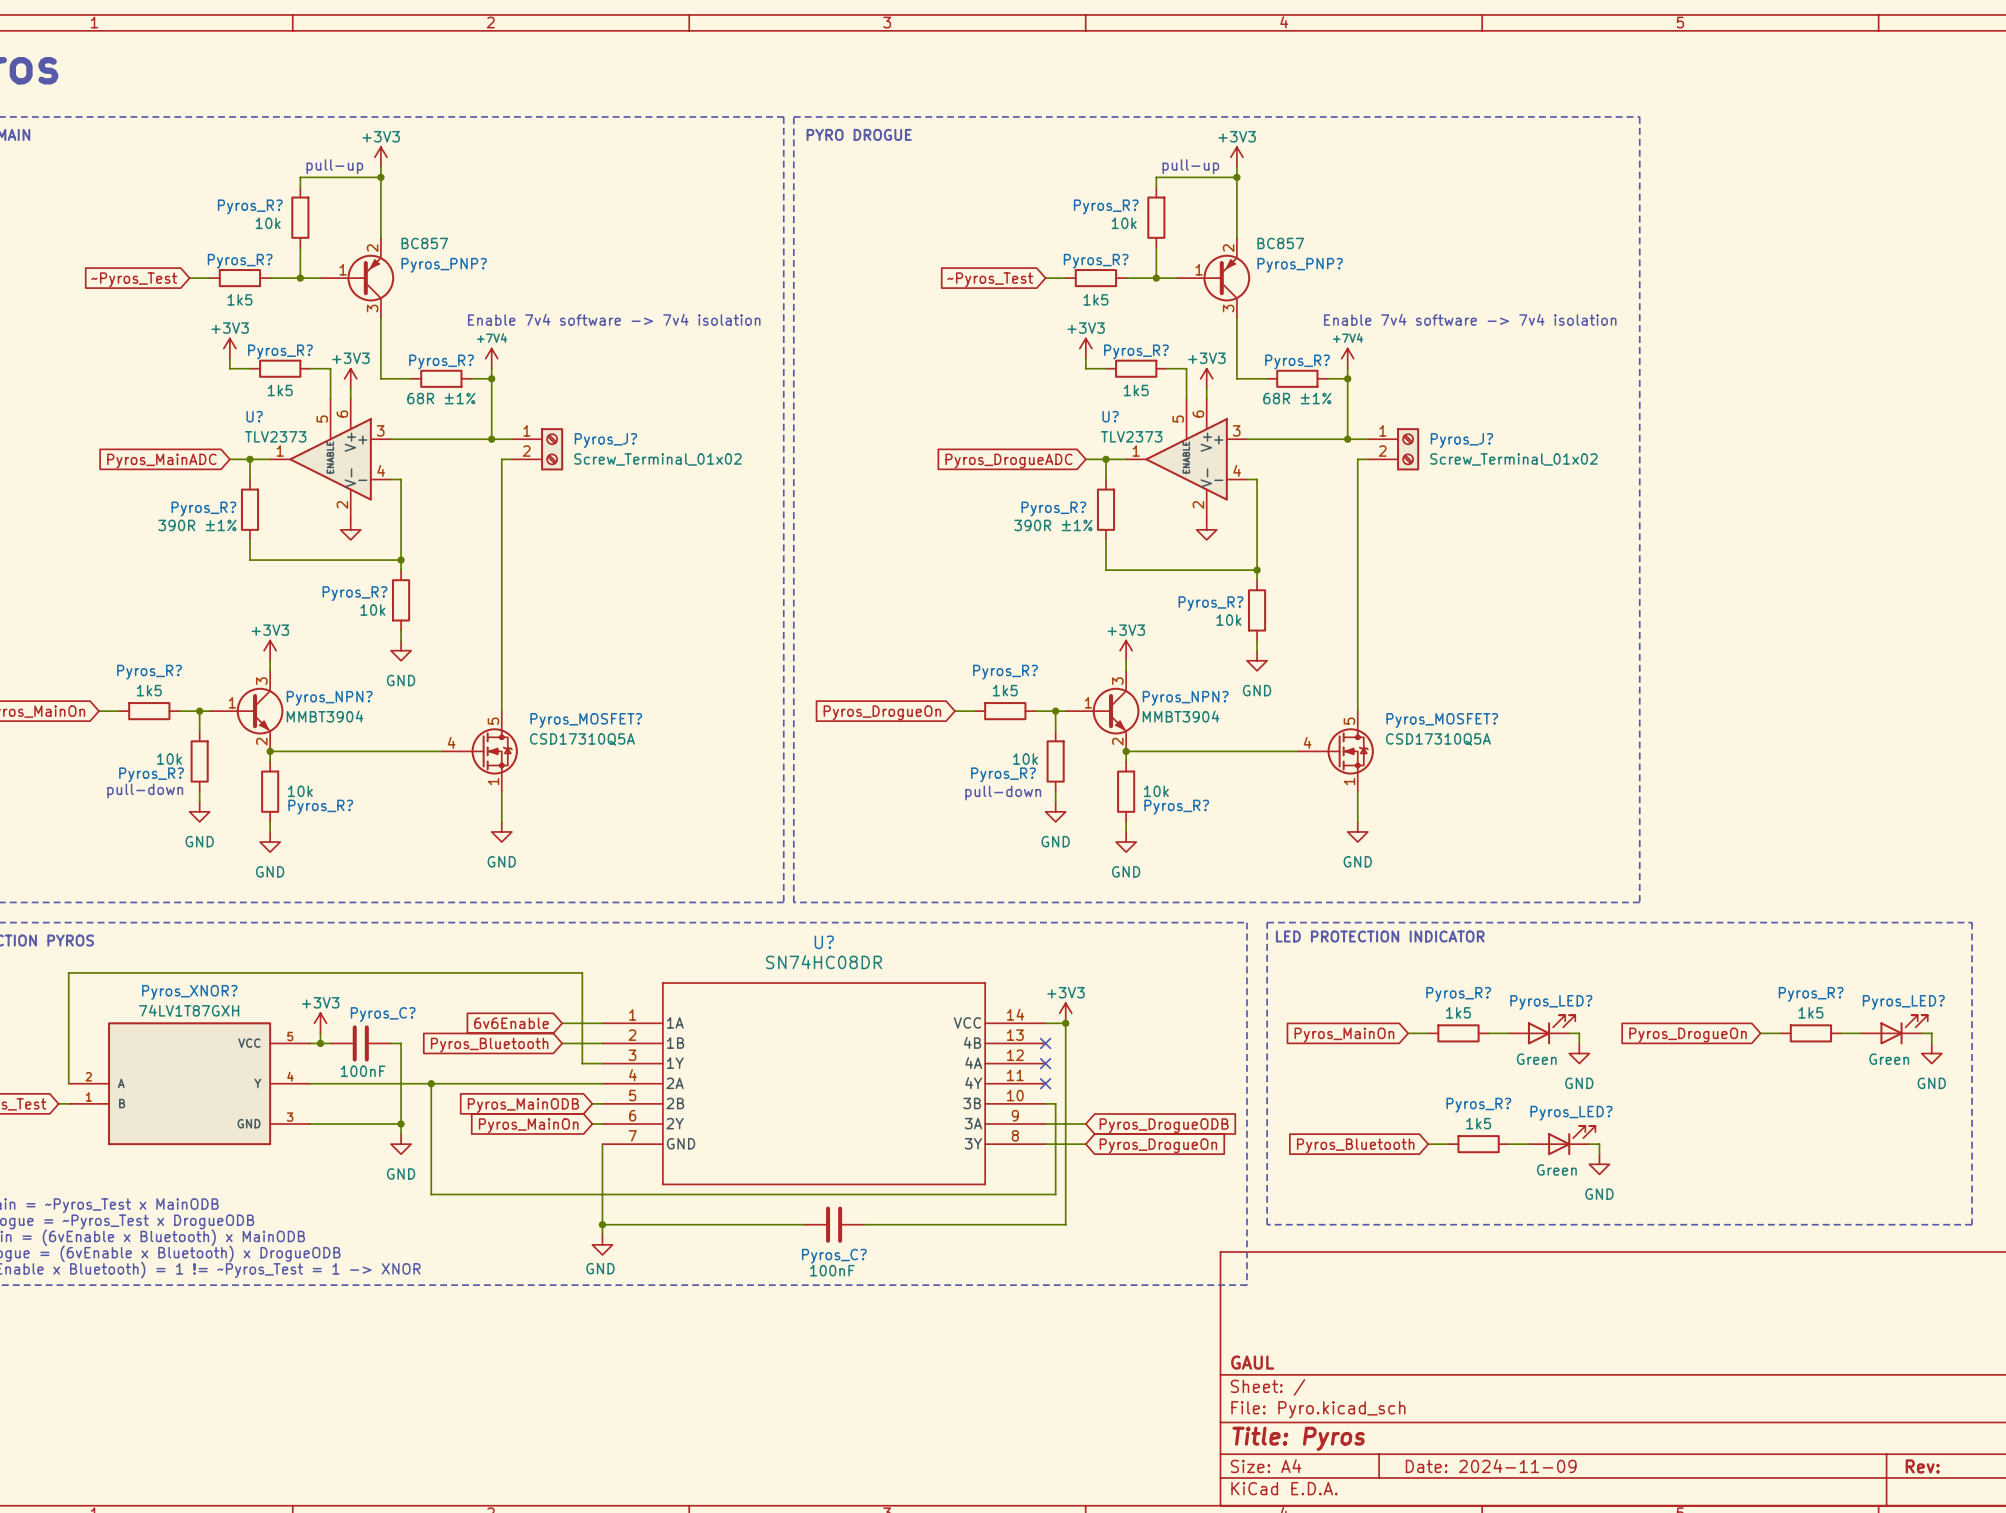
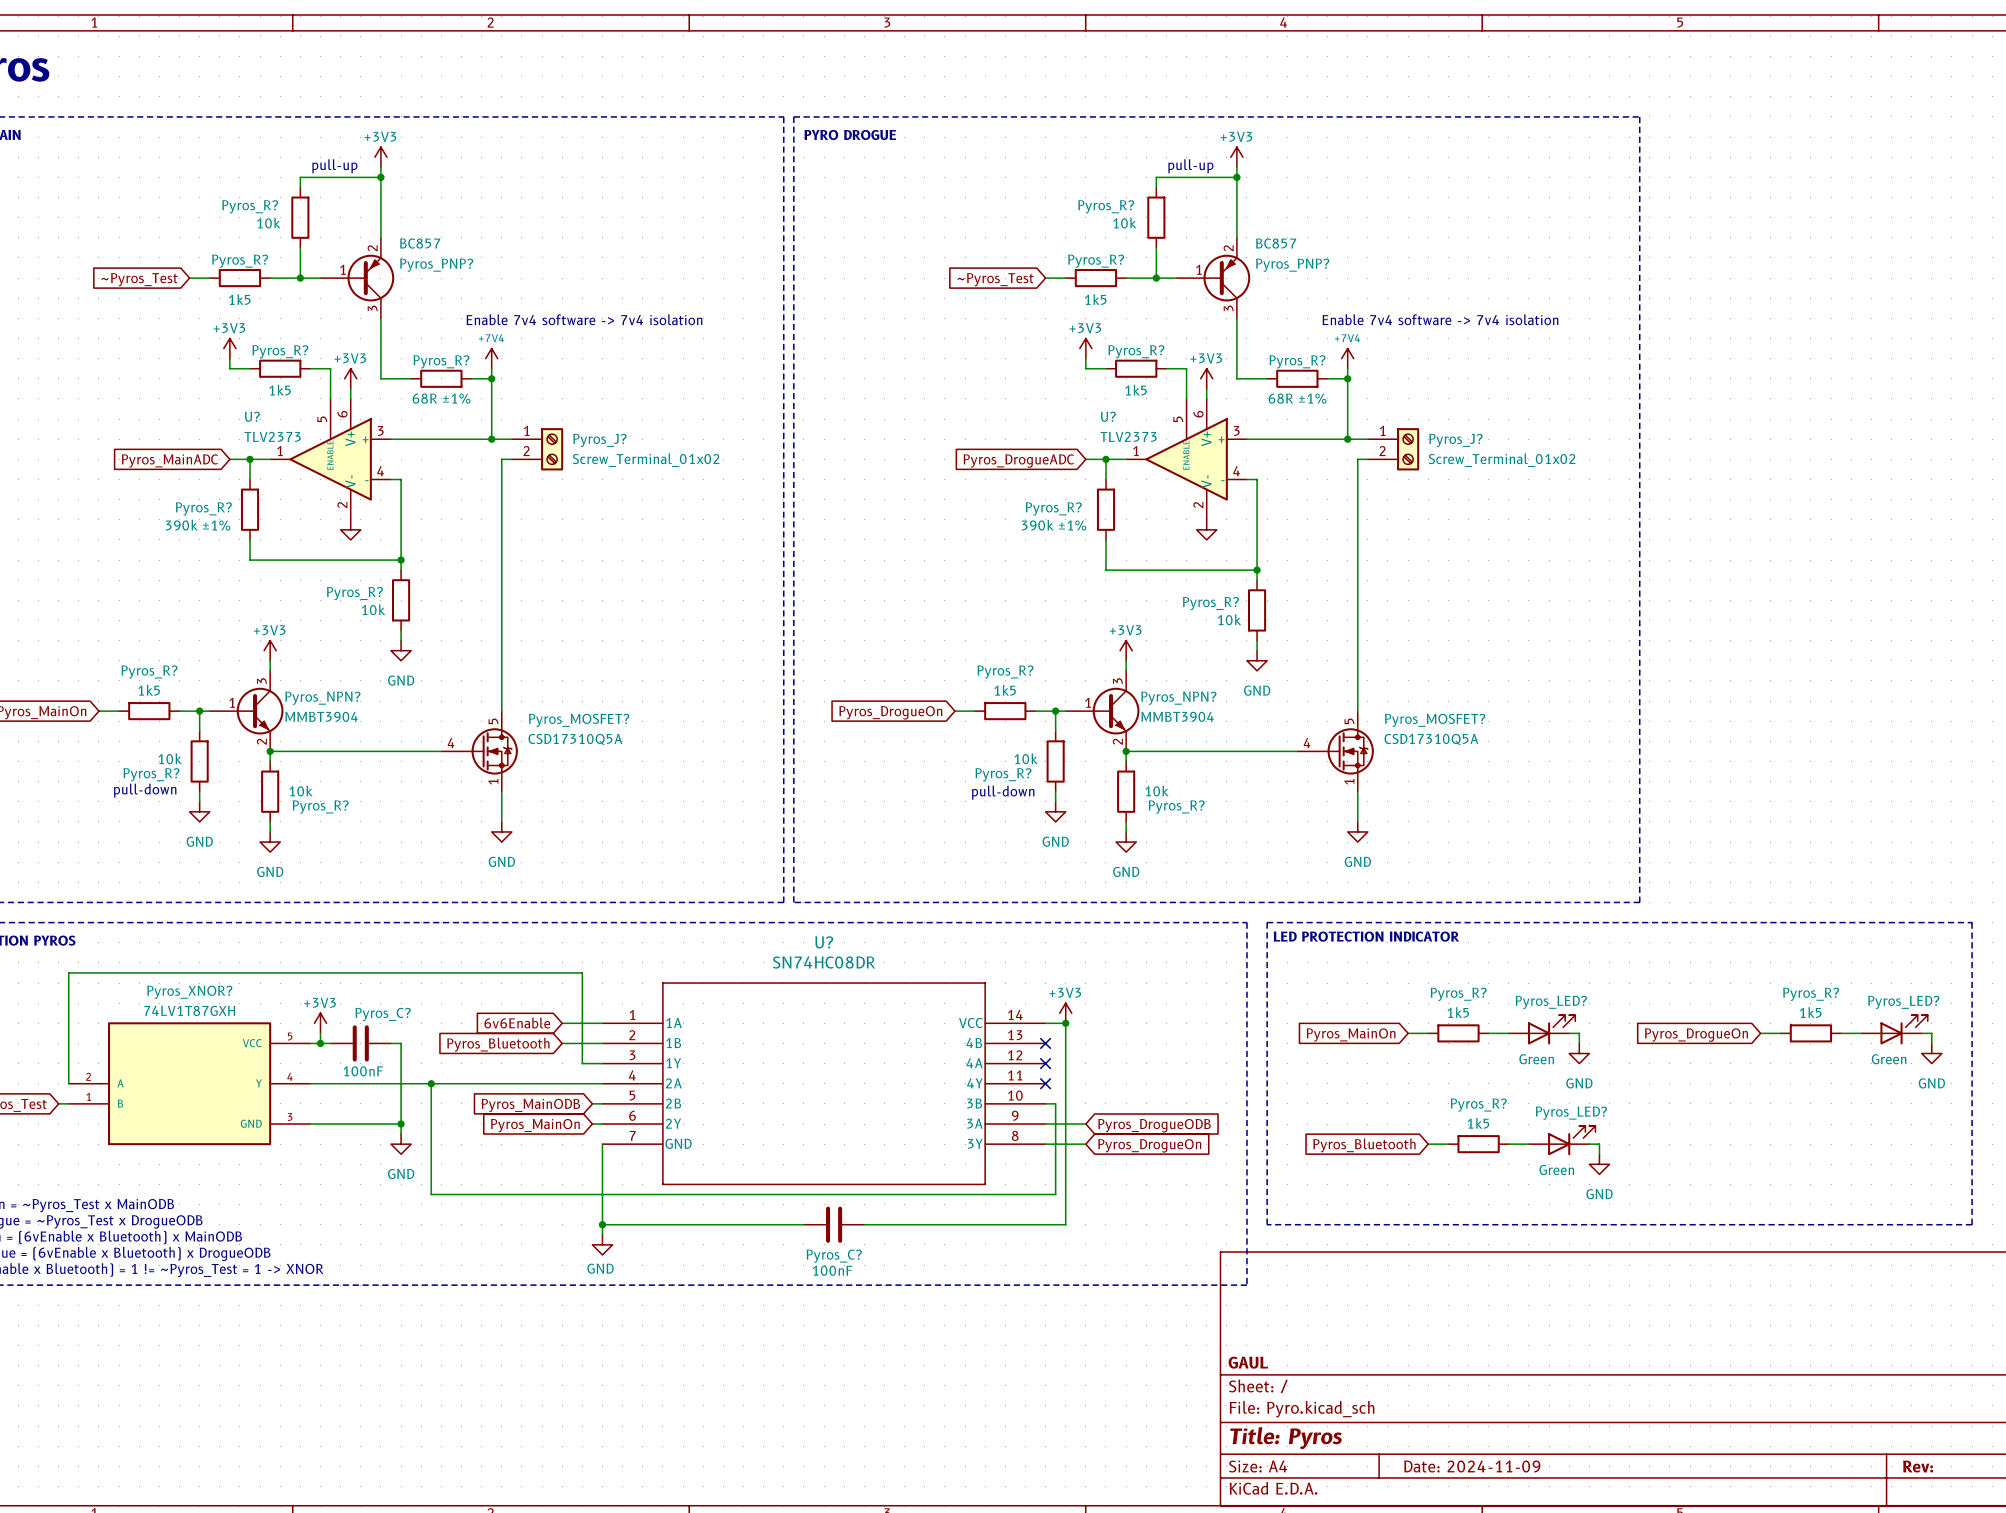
Pyros_R? value: 390R ±1% (197, 525) -> 390k ±1% (198, 525)
Pyros_R? value: 390R ±1% (1053, 525) -> 390k ±1% (1054, 525)

